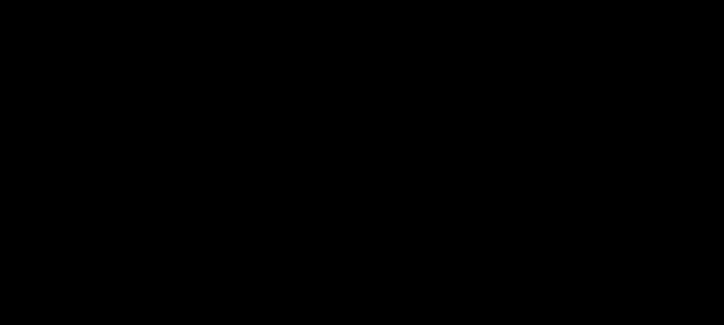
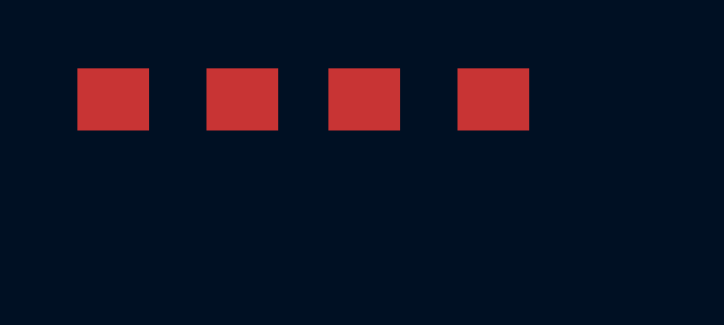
part: none -> (177, 99)
part: none -> (428, 99)

